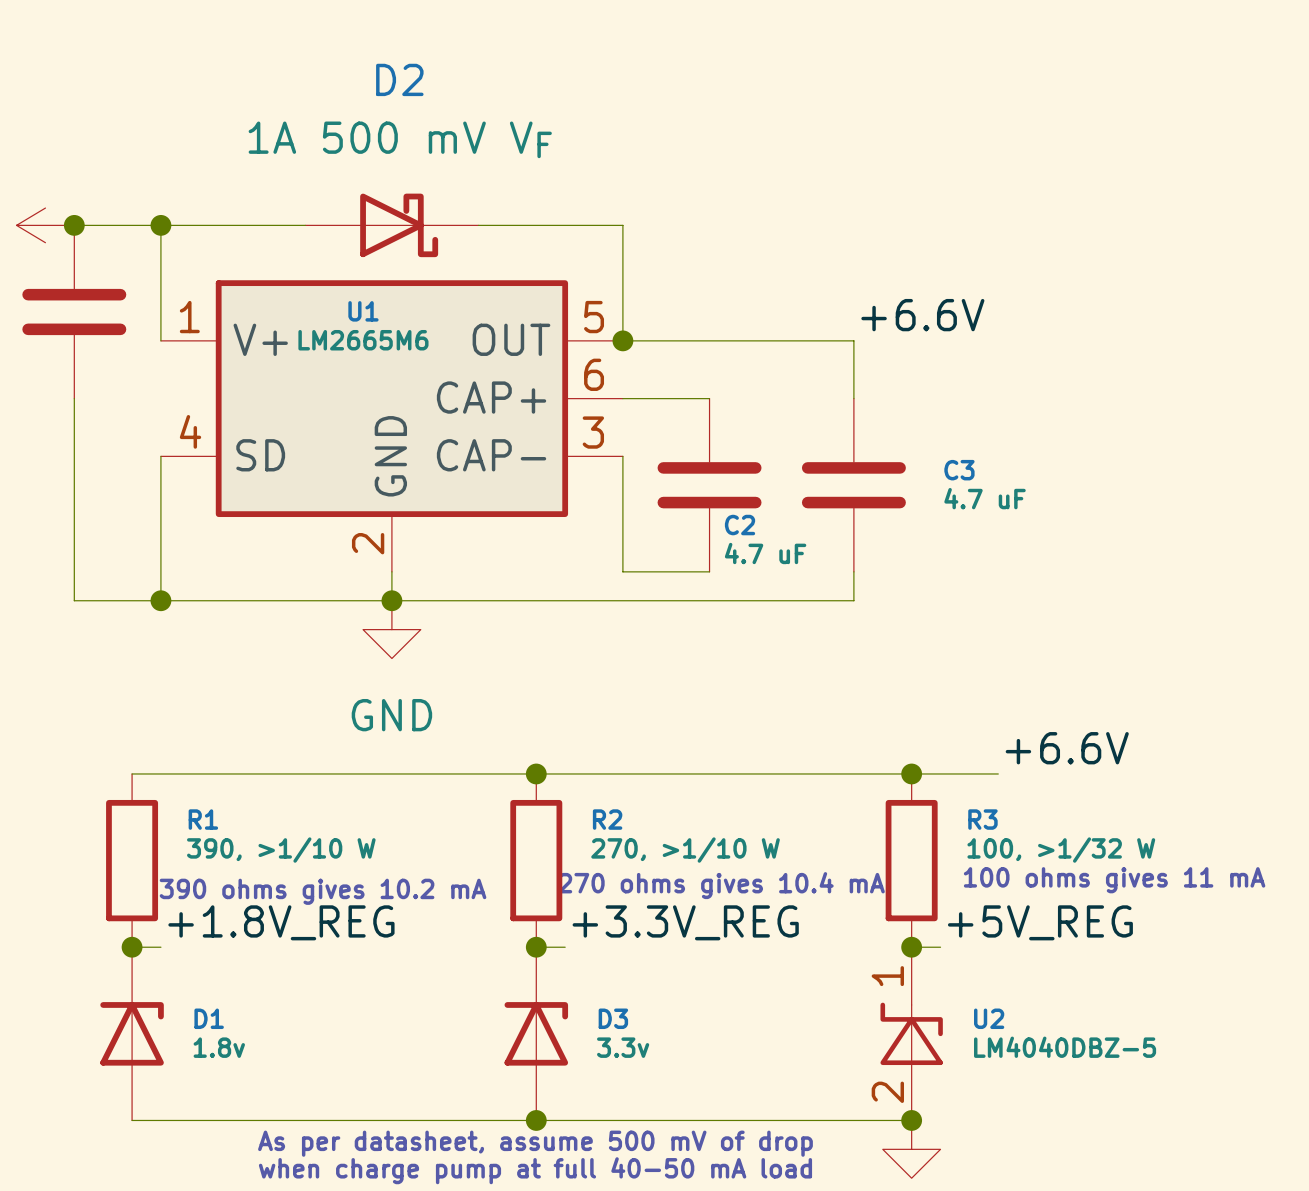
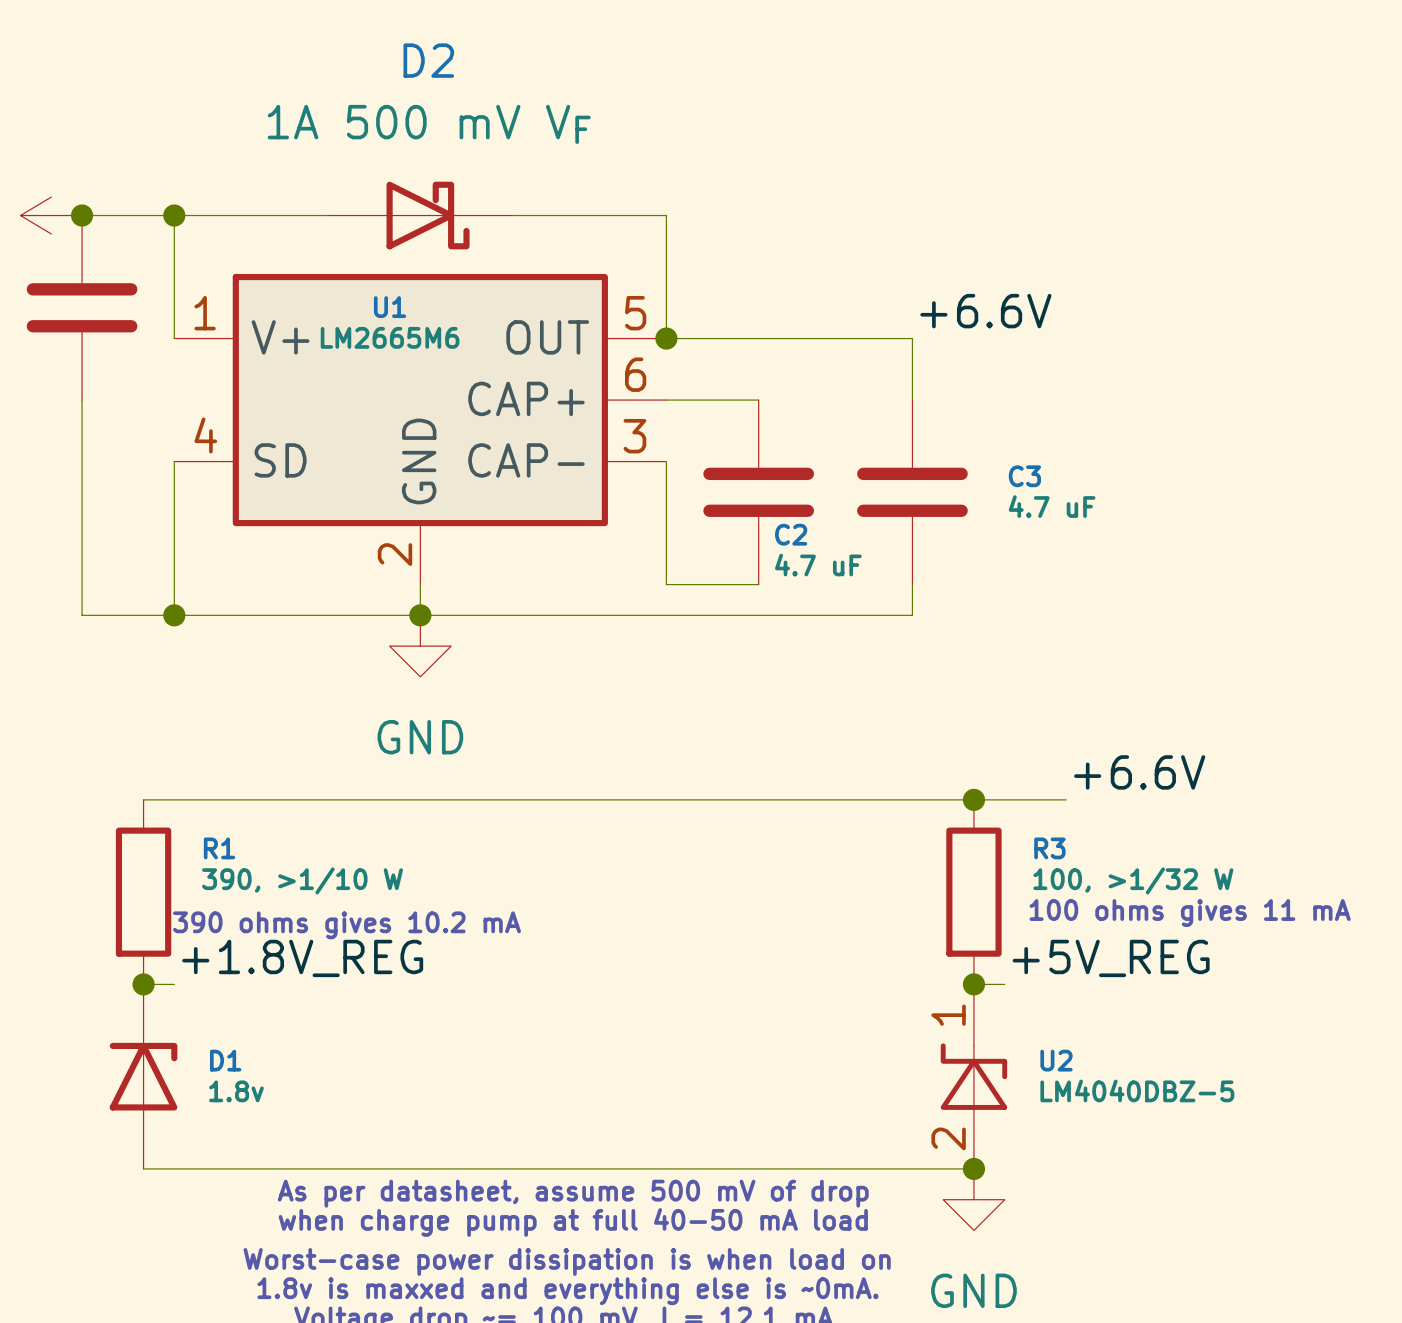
junction: (536, 773) -> none
R2: 270, >1/10 W (536, 860) -> none
text: 270 ohms gives 10.4 mA (721, 885) -> none
label: +3.3V_REG (685, 922) -> none
wire: (536, 947) (565, 947) -> none
junction: (536, 947) -> none
D3: 3.3v (536, 1033) -> none
junction: (536, 1120) -> none

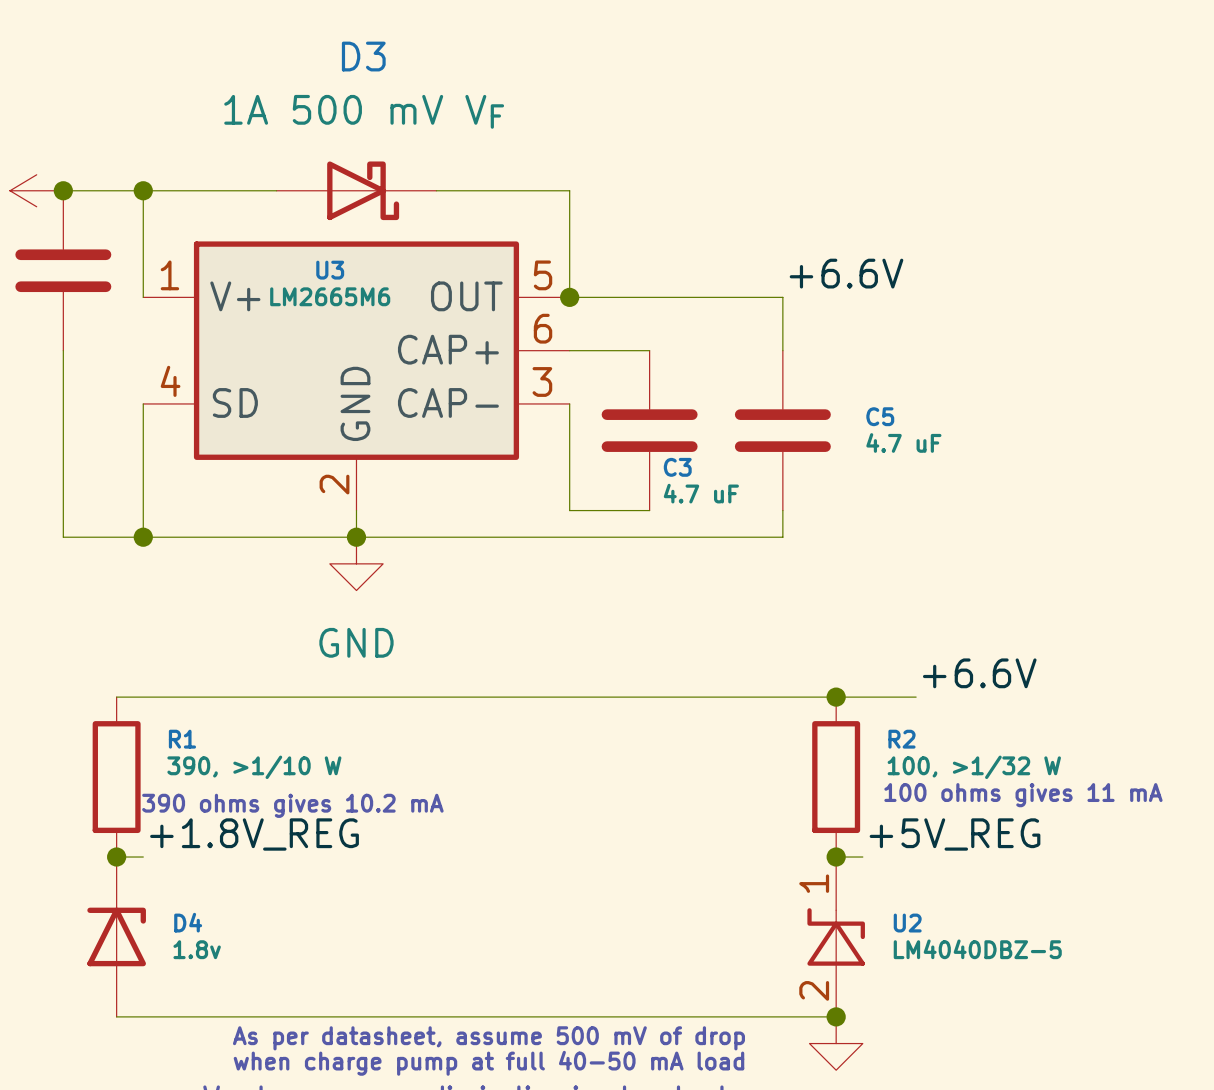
D2 name: D2 (428, 60) -> D3 (363, 56)
U1 name: U1 (390, 307) -> U3 (330, 270)
C3 name: C3 (1024, 476) -> C5 (880, 416)
C2 name: C2 (791, 534) -> C3 (677, 467)
R3 name: R3 (1049, 848) -> R2 (901, 739)
D1 name: D1 (225, 1060) -> D4 (188, 922)

